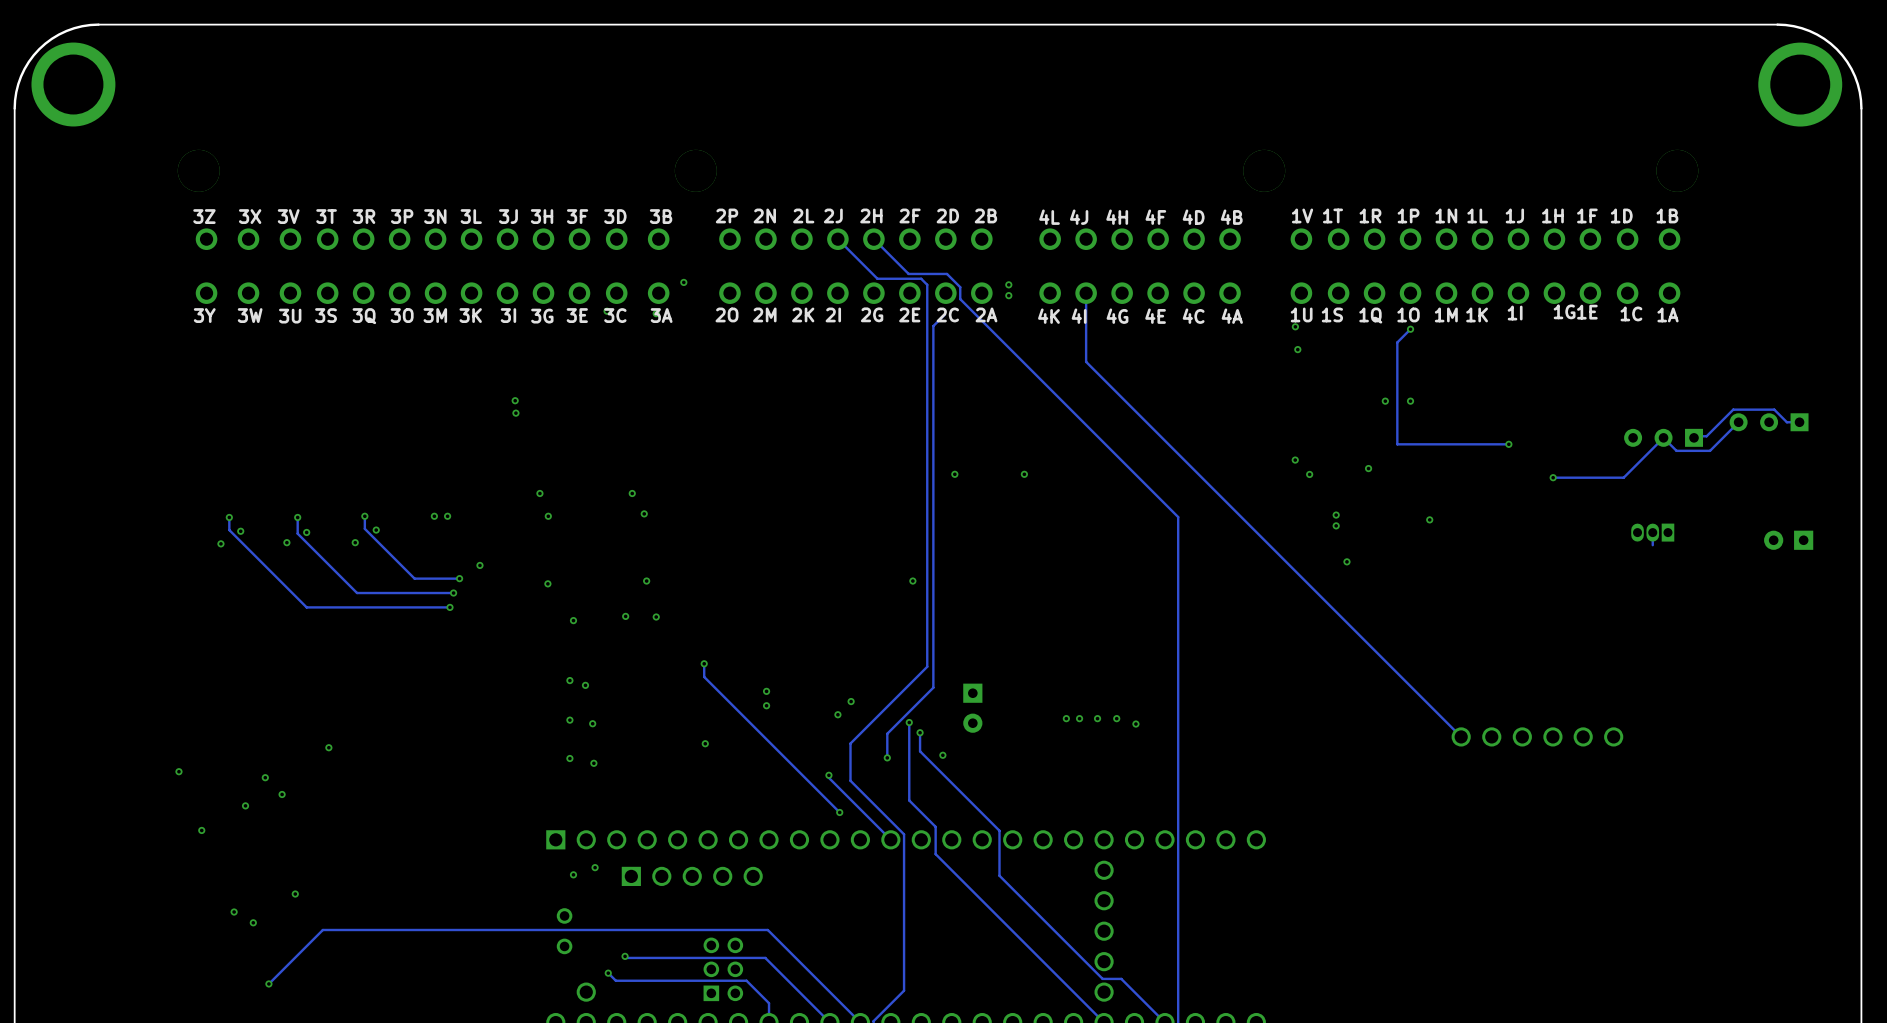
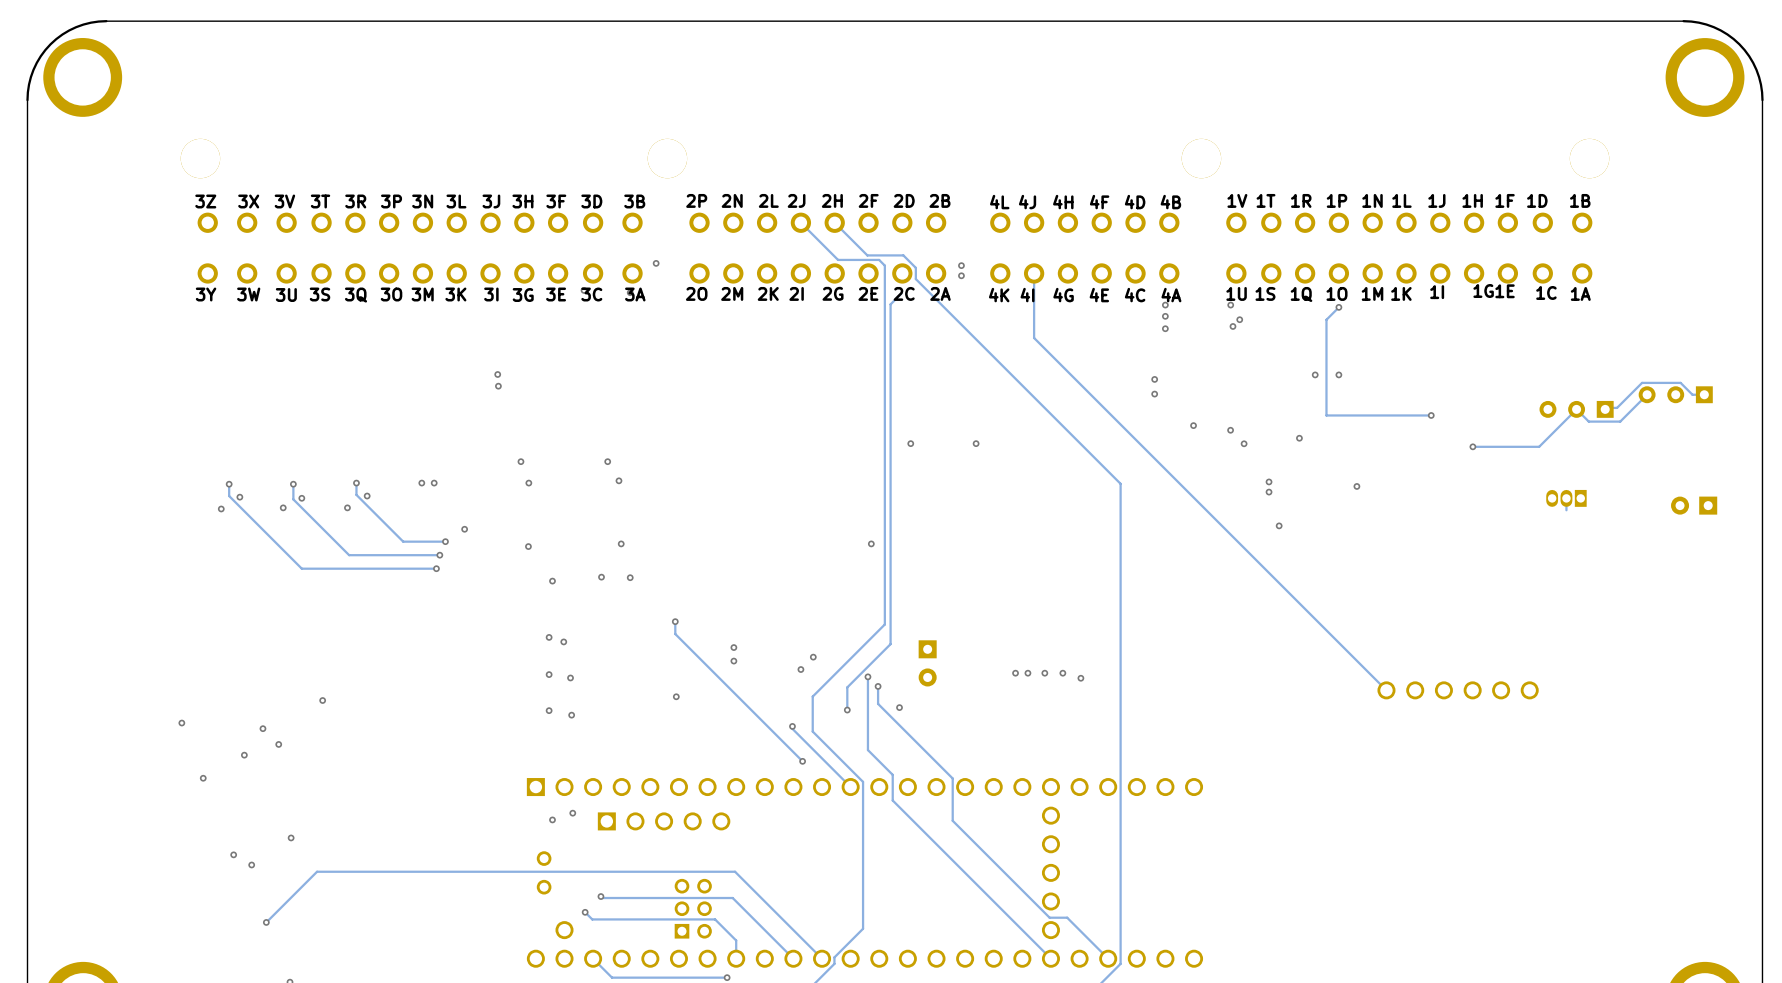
via: none -> (1165, 305)
via: none -> (1165, 316)
via: none -> (1239, 319)
via: none -> (1165, 328)
via: none -> (1154, 379)
via: none -> (1154, 394)
via: none -> (1193, 425)

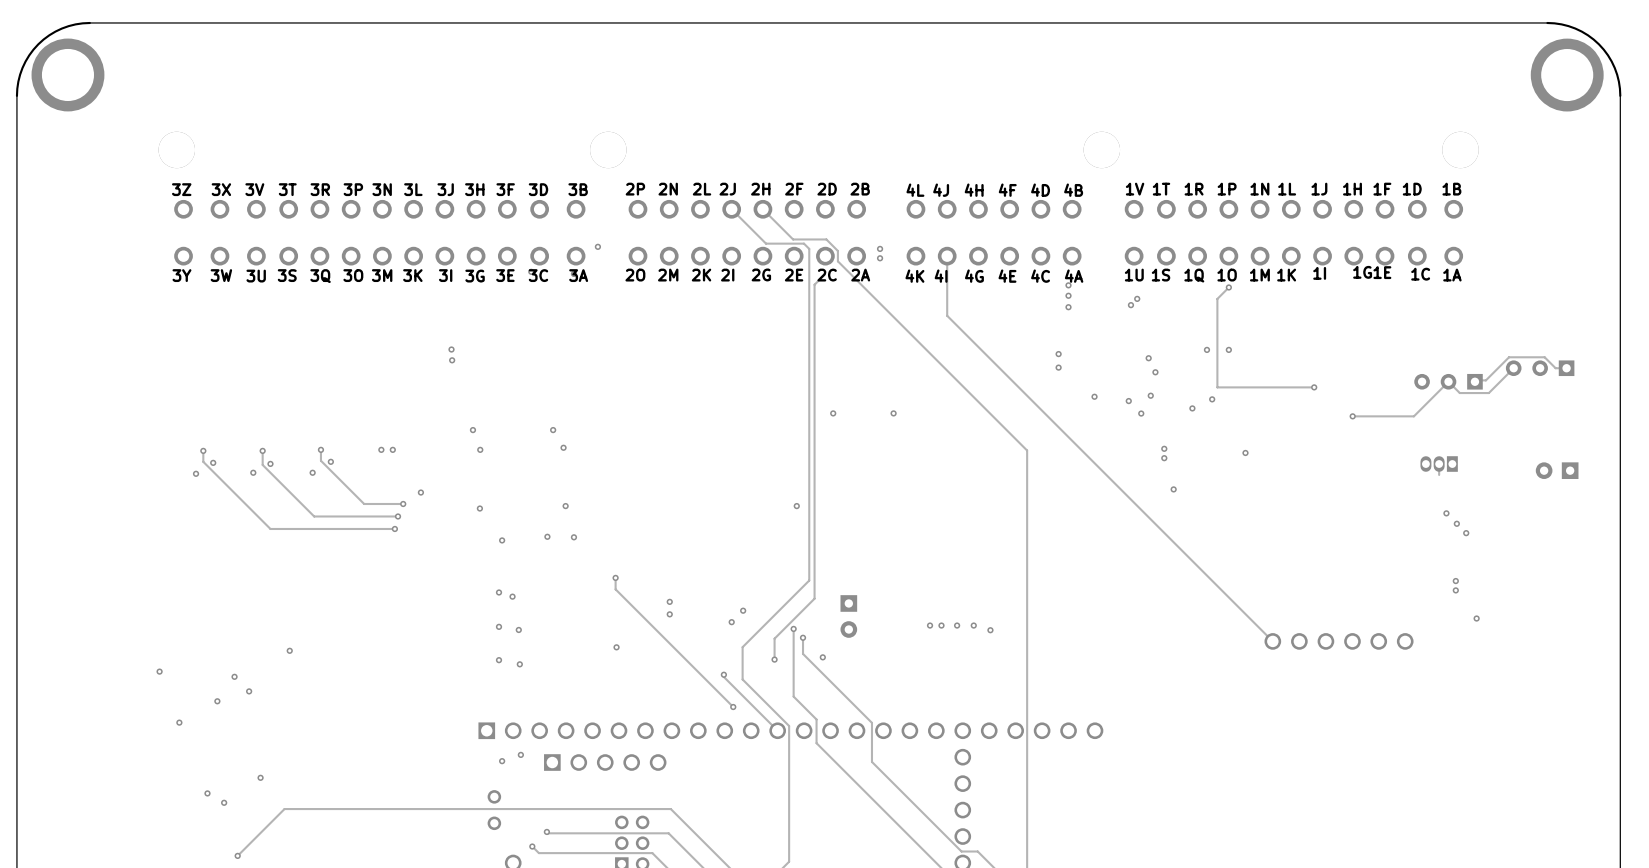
via: (1230, 305) -> none
via: none -> (1148, 358)
via: none -> (1155, 372)
via: none -> (1150, 395)
via: none -> (1212, 399)
via: none -> (1446, 513)
via: none -> (1456, 523)
via: none -> (1466, 533)
via: none -> (1455, 581)
via: none -> (1455, 590)
via: none -> (1476, 618)

